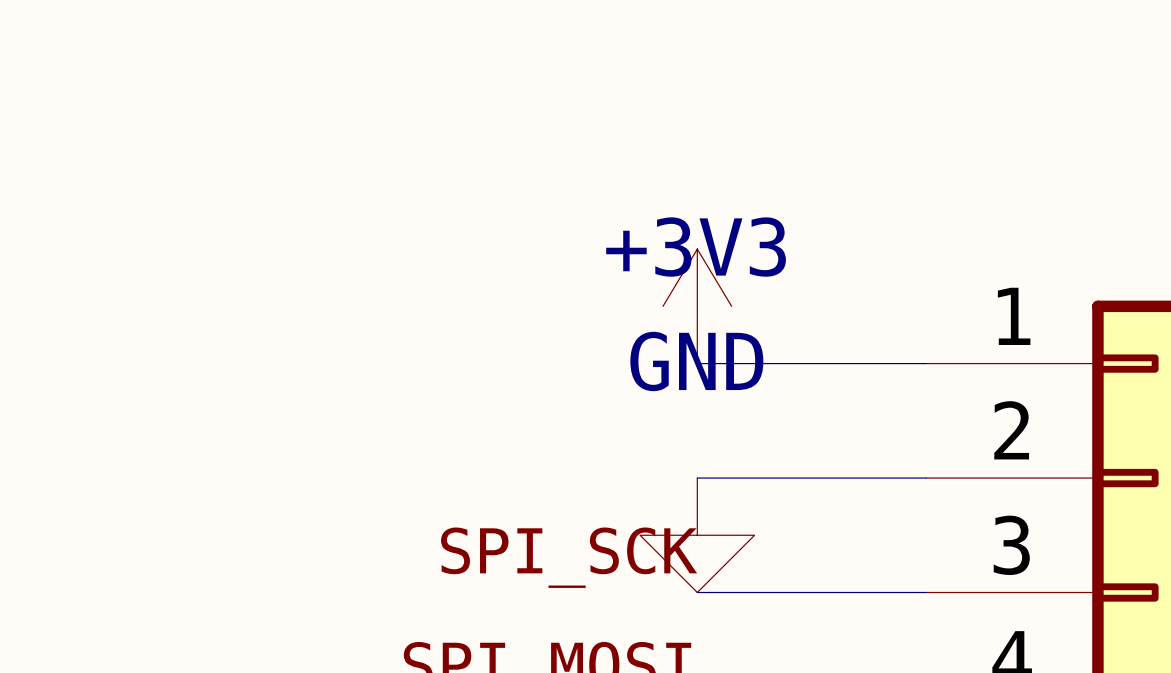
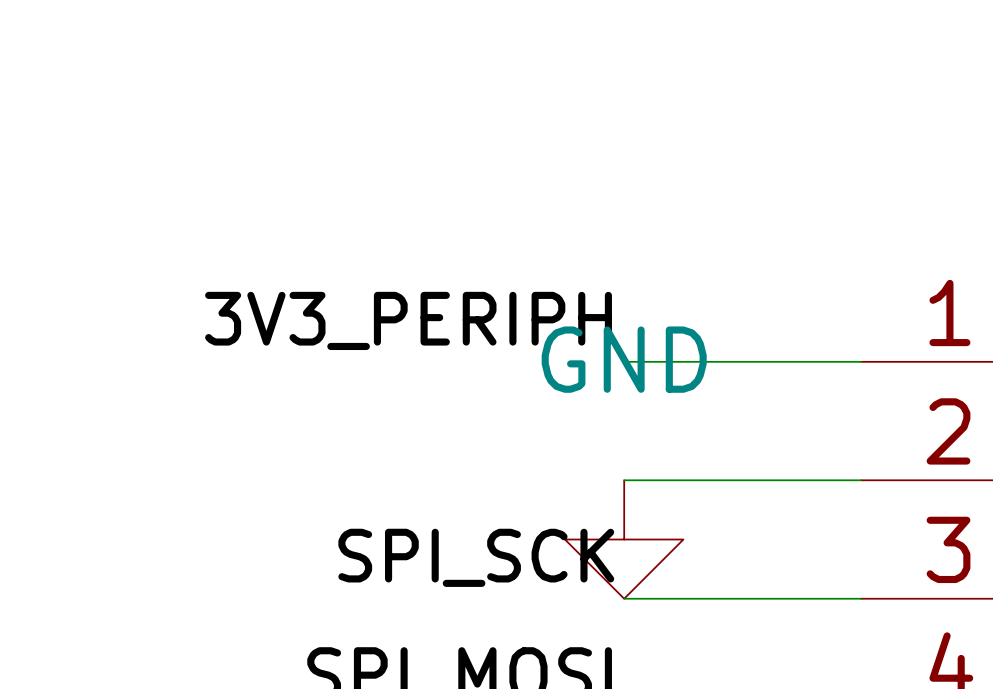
power symbol: +3V3 (697, 306) -> none
label: none -> 3V3_PERIPH (408, 320)

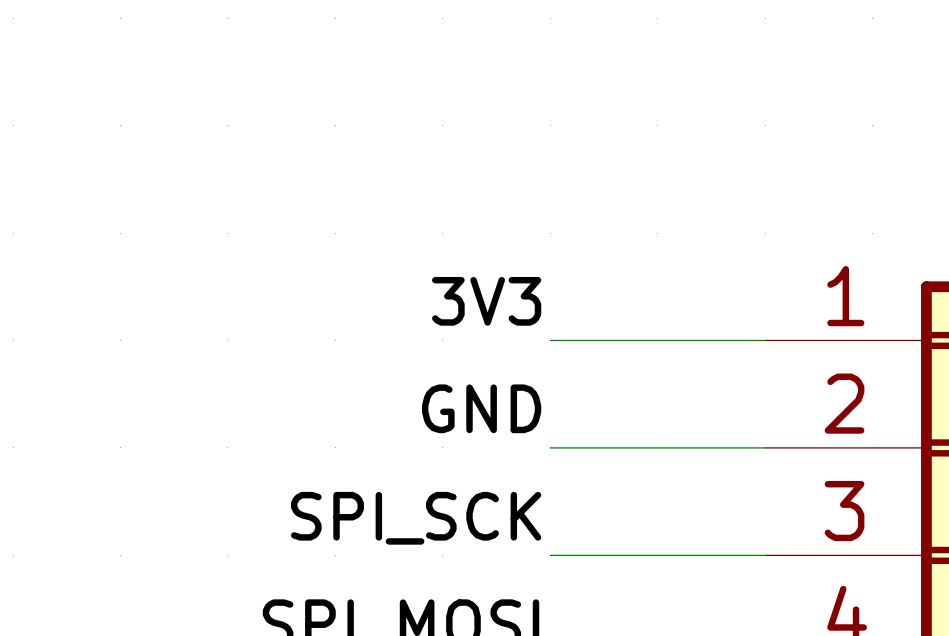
label: 3V3_PERIPH (408, 320) -> 3V3 (486, 301)
label: none -> GND (481, 408)
power symbol: GND (624, 539) -> none

